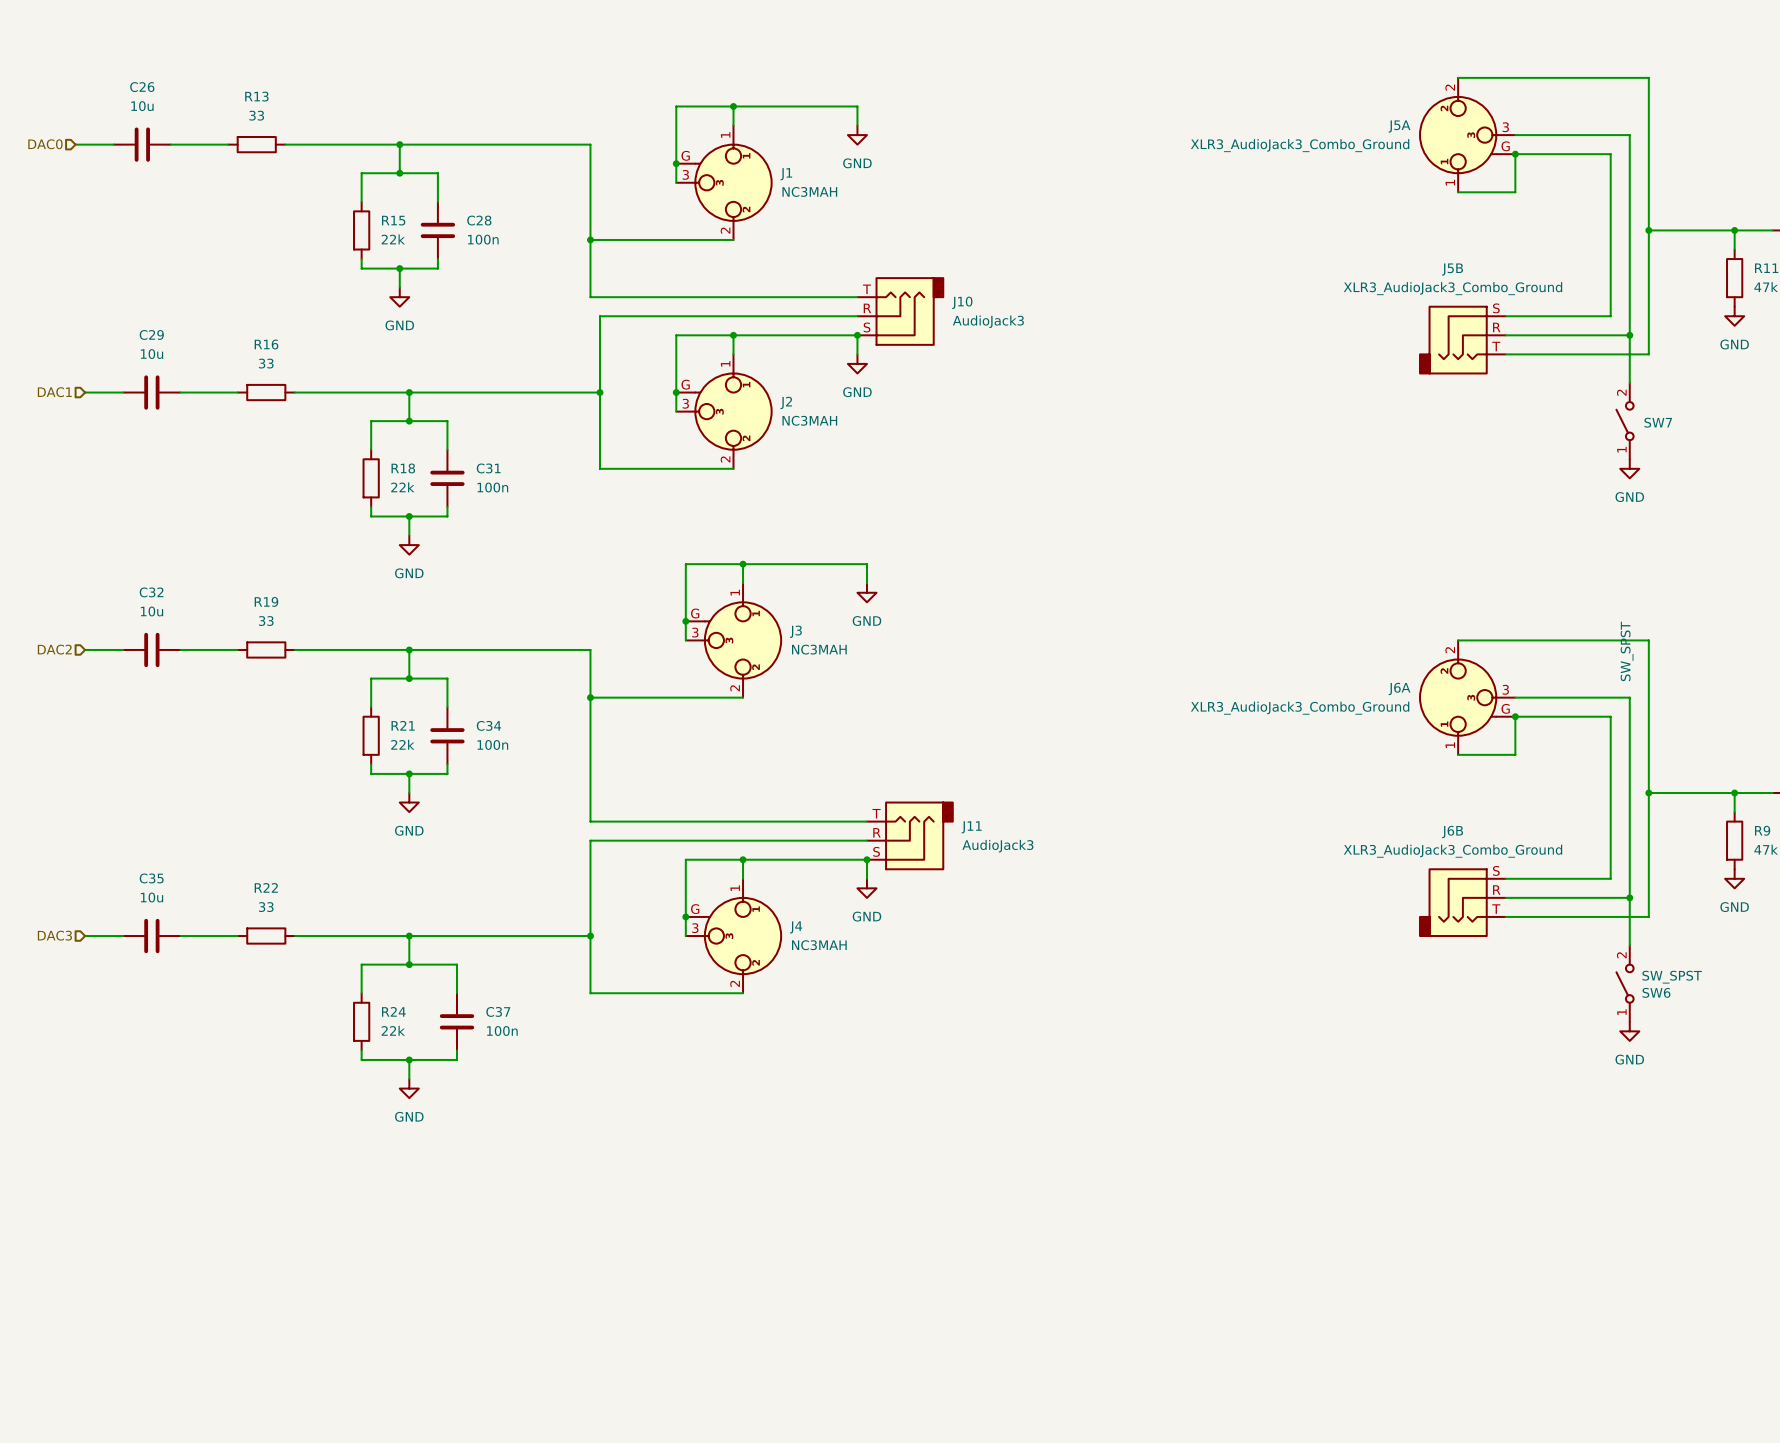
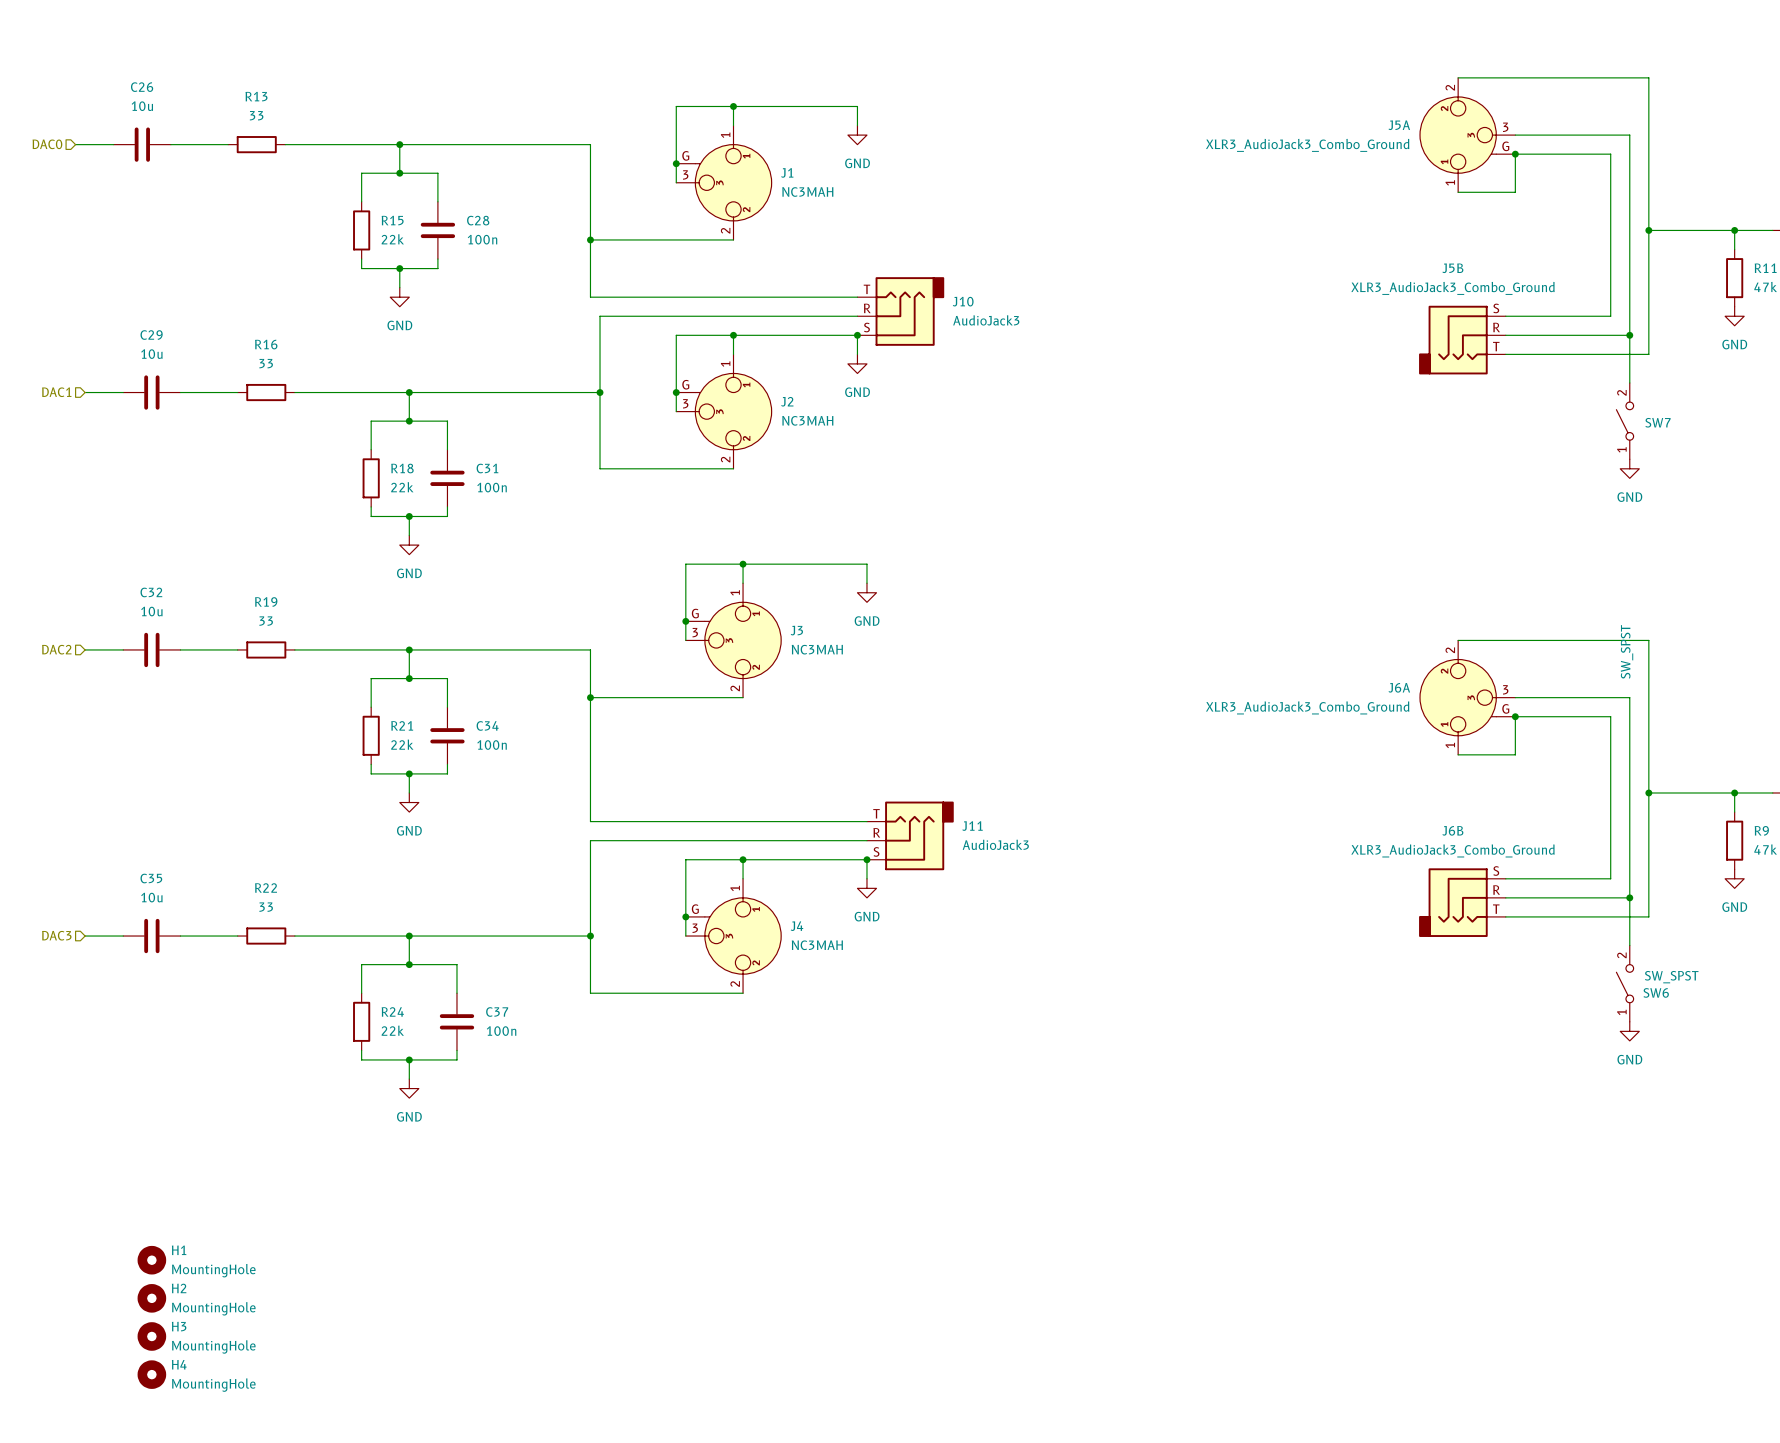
H1: none -> MountingHole (151, 1260)
H2: none -> MountingHole (151, 1298)
H3: none -> MountingHole (151, 1336)
H4: none -> MountingHole (151, 1374)

